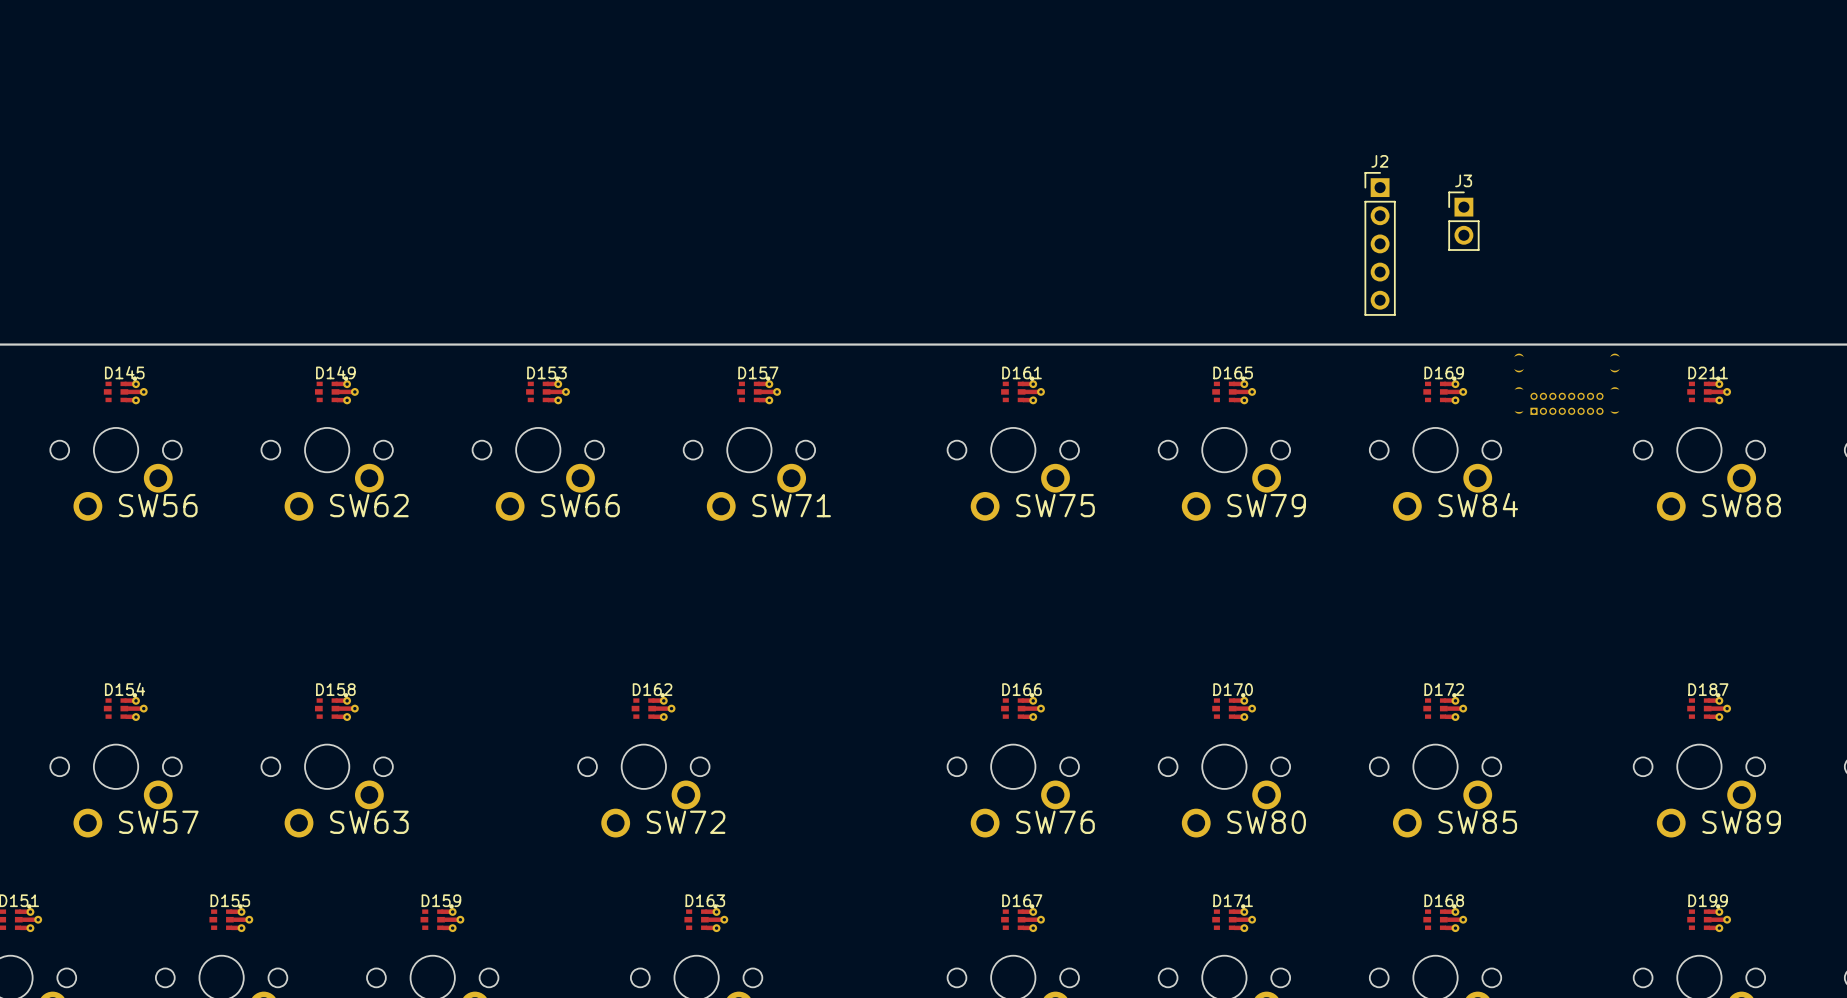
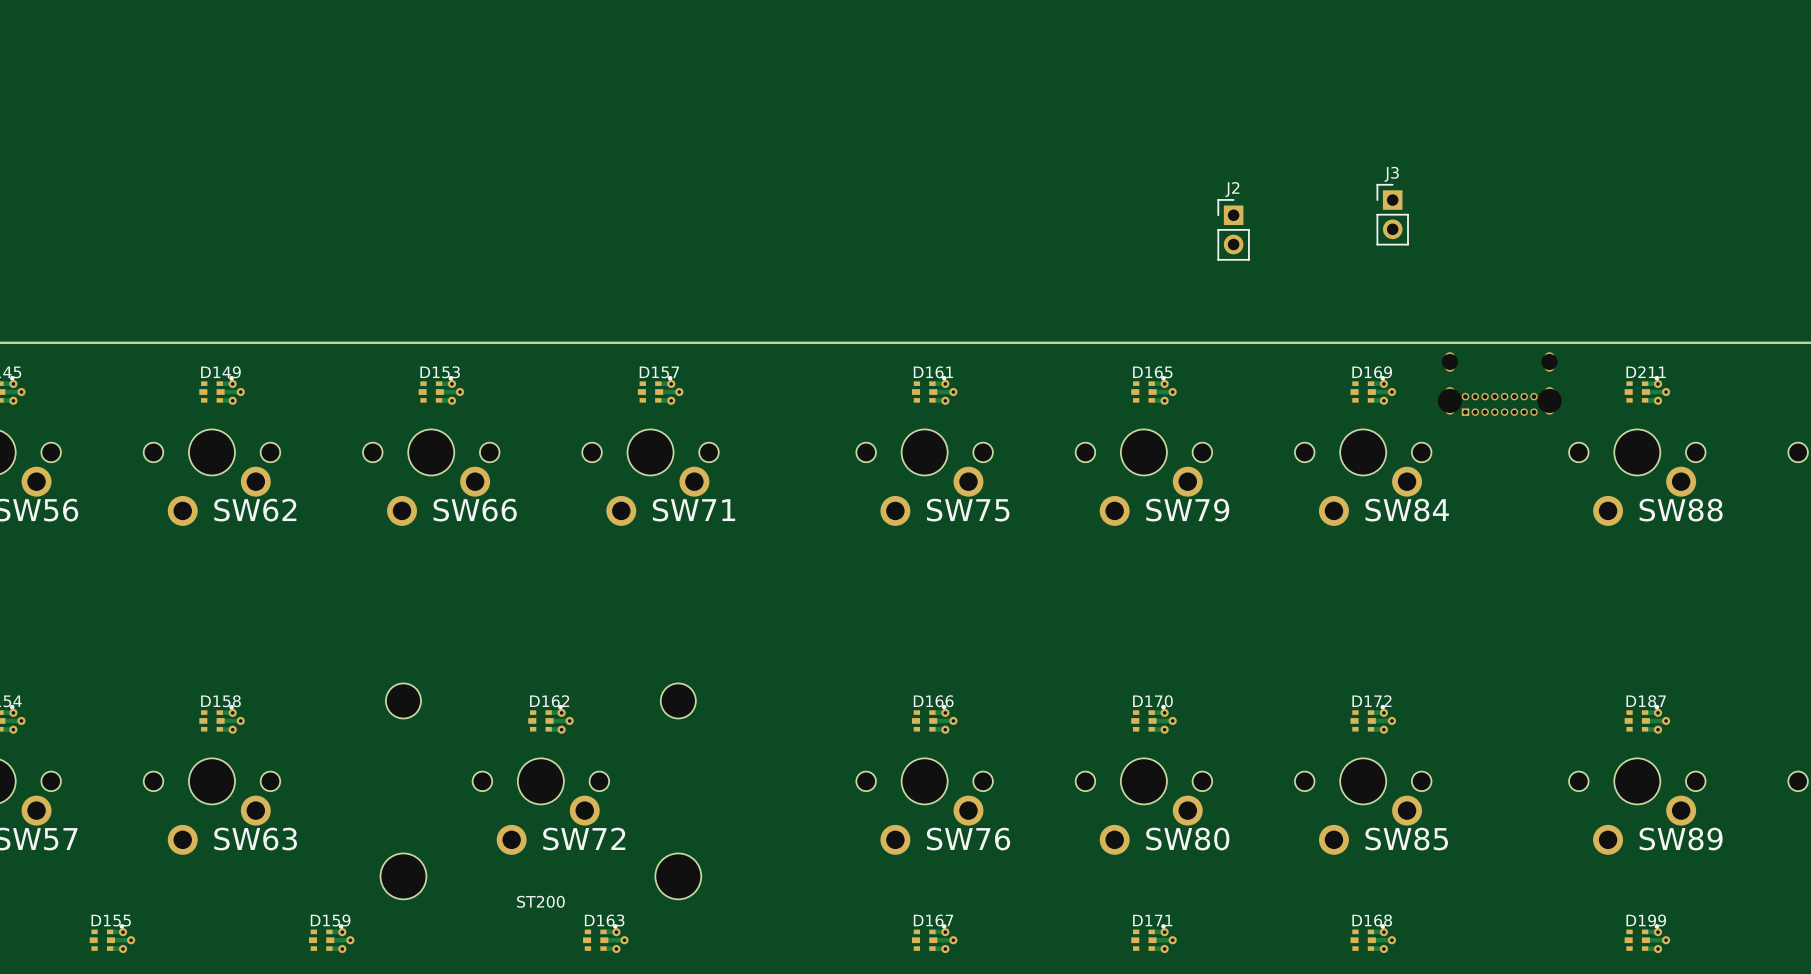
J2 name position: J2 (1379, 161) -> J2 (1232, 189)
J2 footprint: [1364, 172, 1396, 316] -> [1217, 199, 1250, 261]
ST200: none -> (540, 791)

